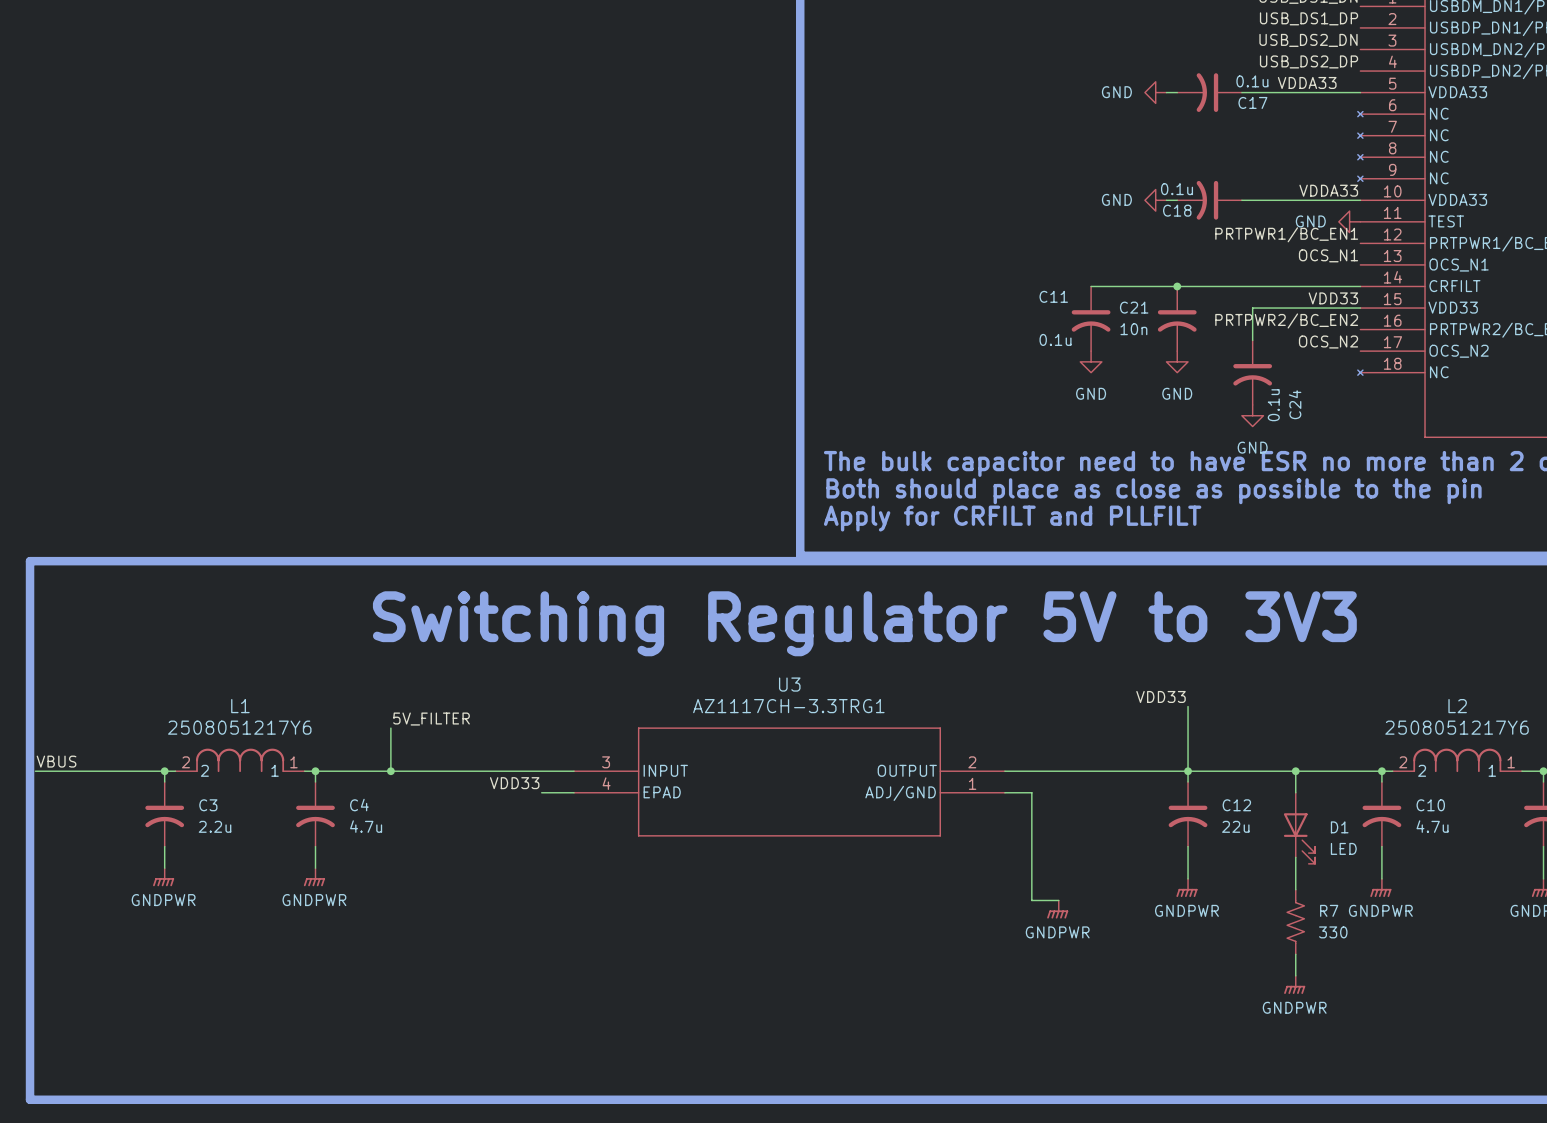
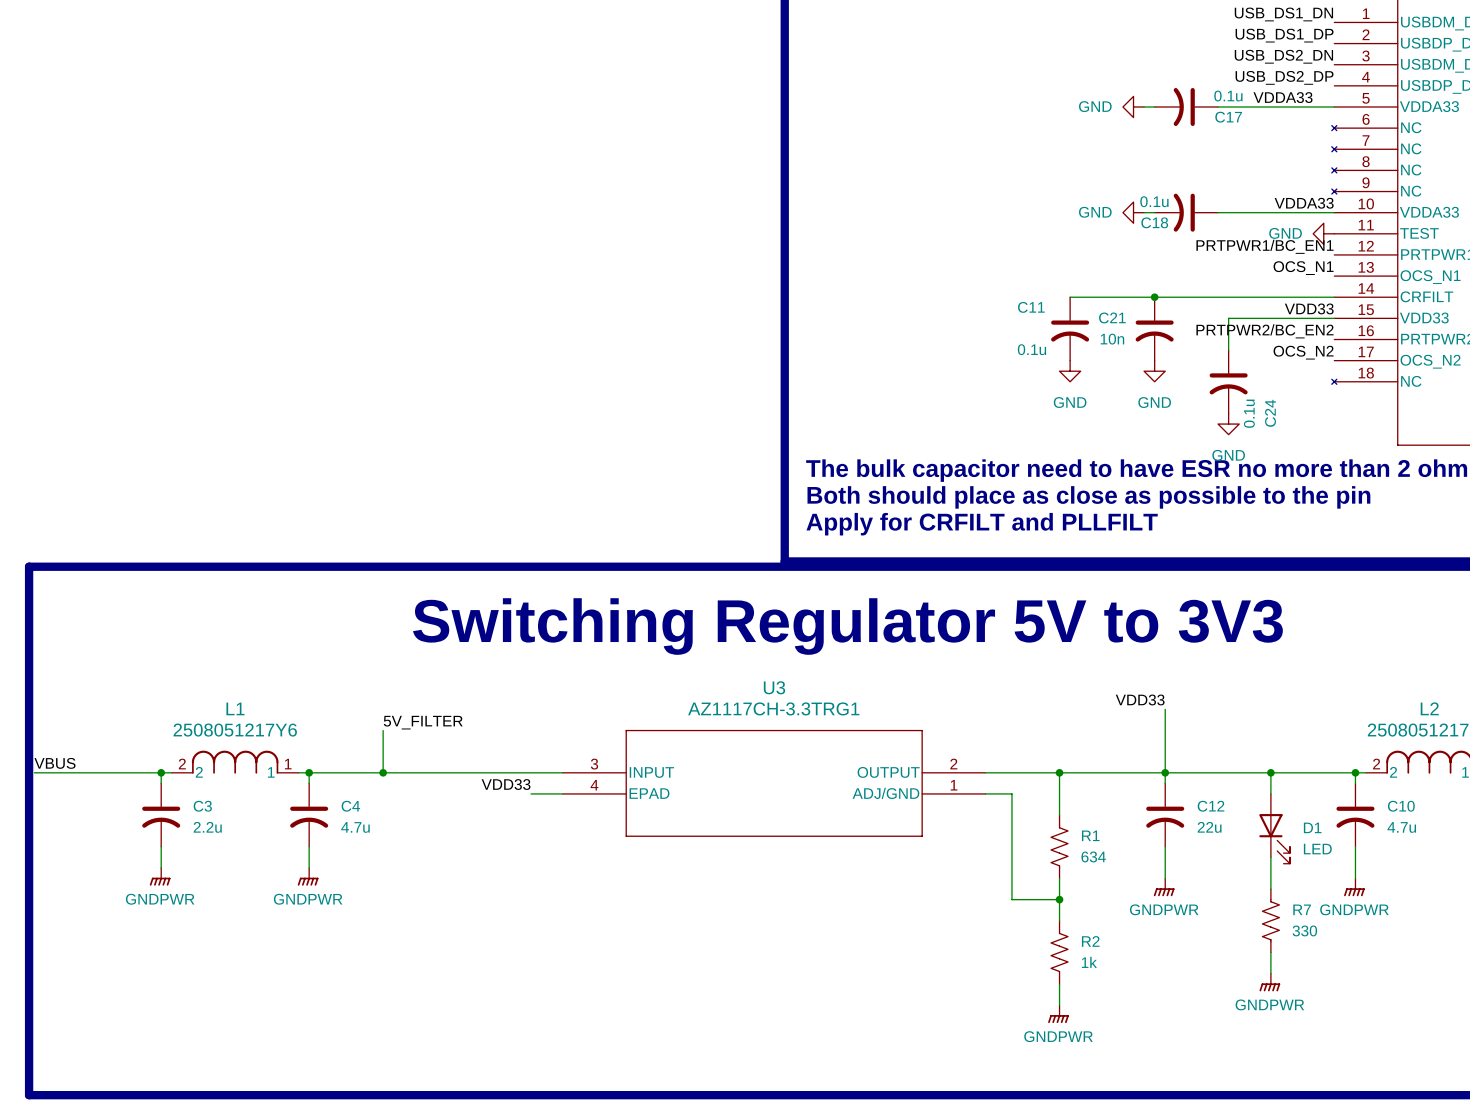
wire: none -> (1059, 772) (1059, 815)
junction: none -> (1059, 772)
R1: none -> 634 (1059, 846)
wire: none -> (1059, 878) (1059, 920)
wire: none -> (1038, 899) (1059, 899)
junction: none -> (1059, 899)
power symbol position: GNDPWR (1057, 909) -> GNDPWR (1058, 1014)
R2: none -> 1k (1059, 952)
wire: none -> (1059, 984) (1059, 1005)

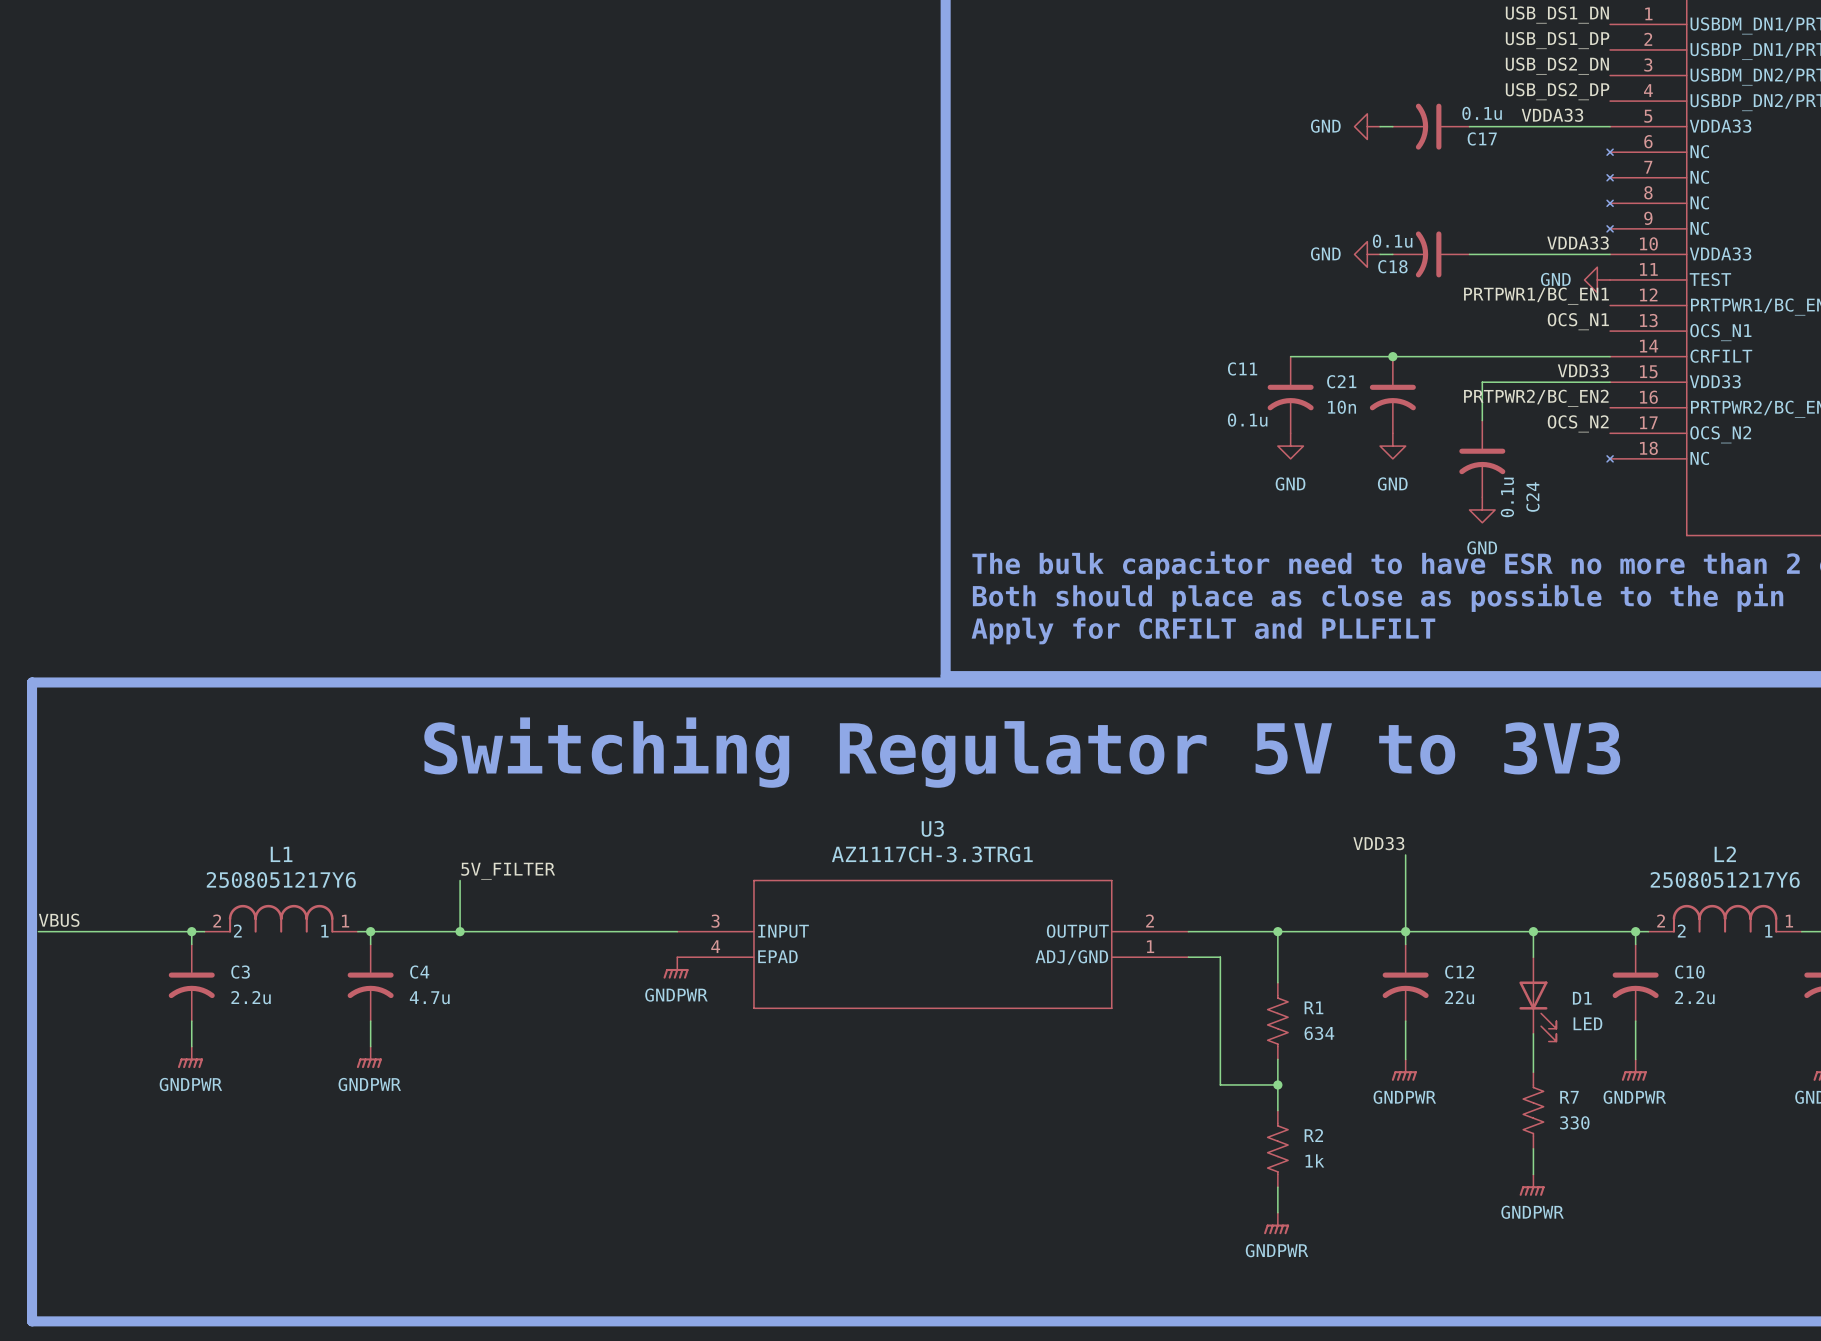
label: VDD33 (506, 784) -> none
wire: (531, 793) (562, 793) -> none
power symbol: none -> GNDPWR (676, 967)
C10 value: 4.7u (1401, 827) -> 2.2u (1694, 997)

